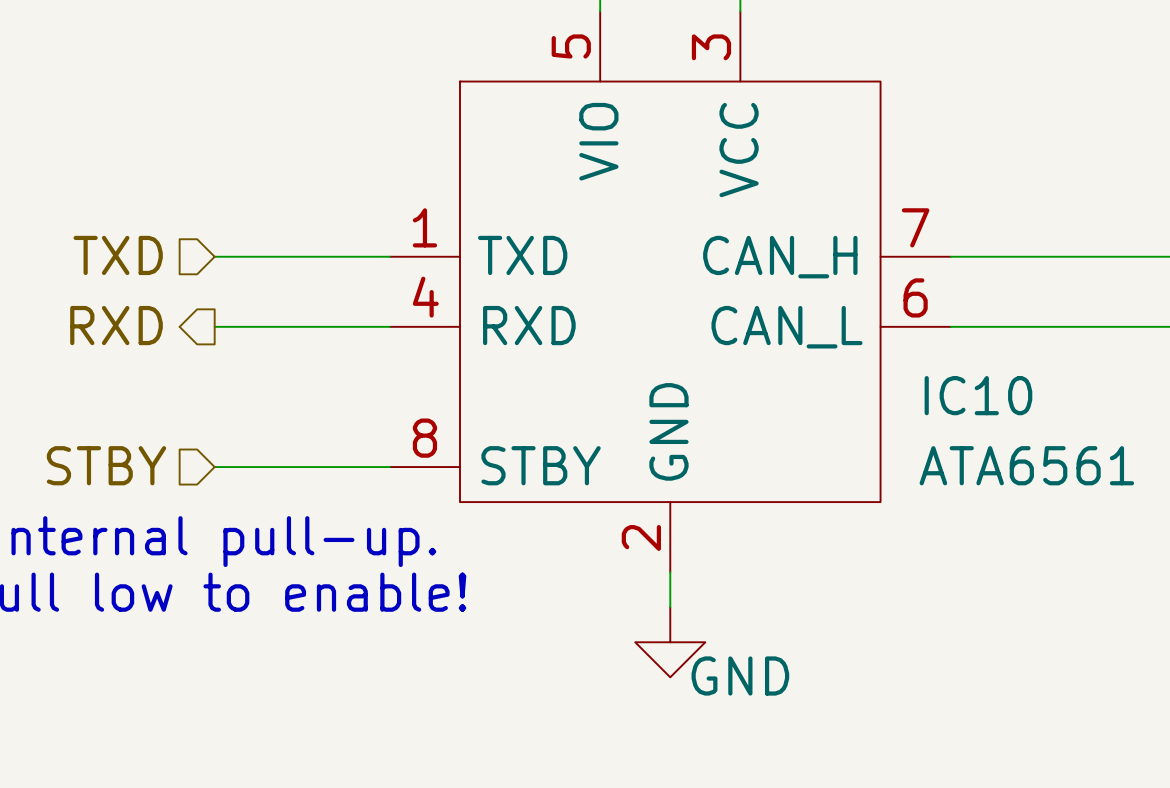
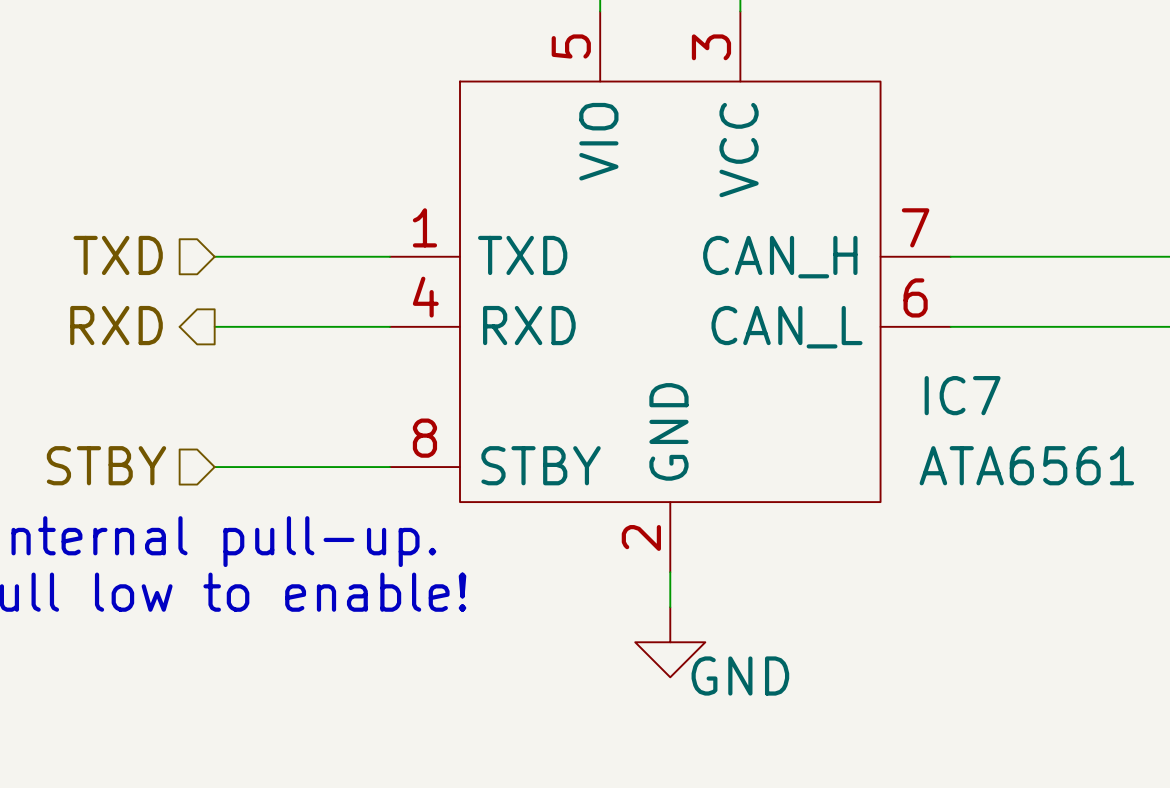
IC10 name: IC10 (978, 395) -> IC7 (962, 395)

